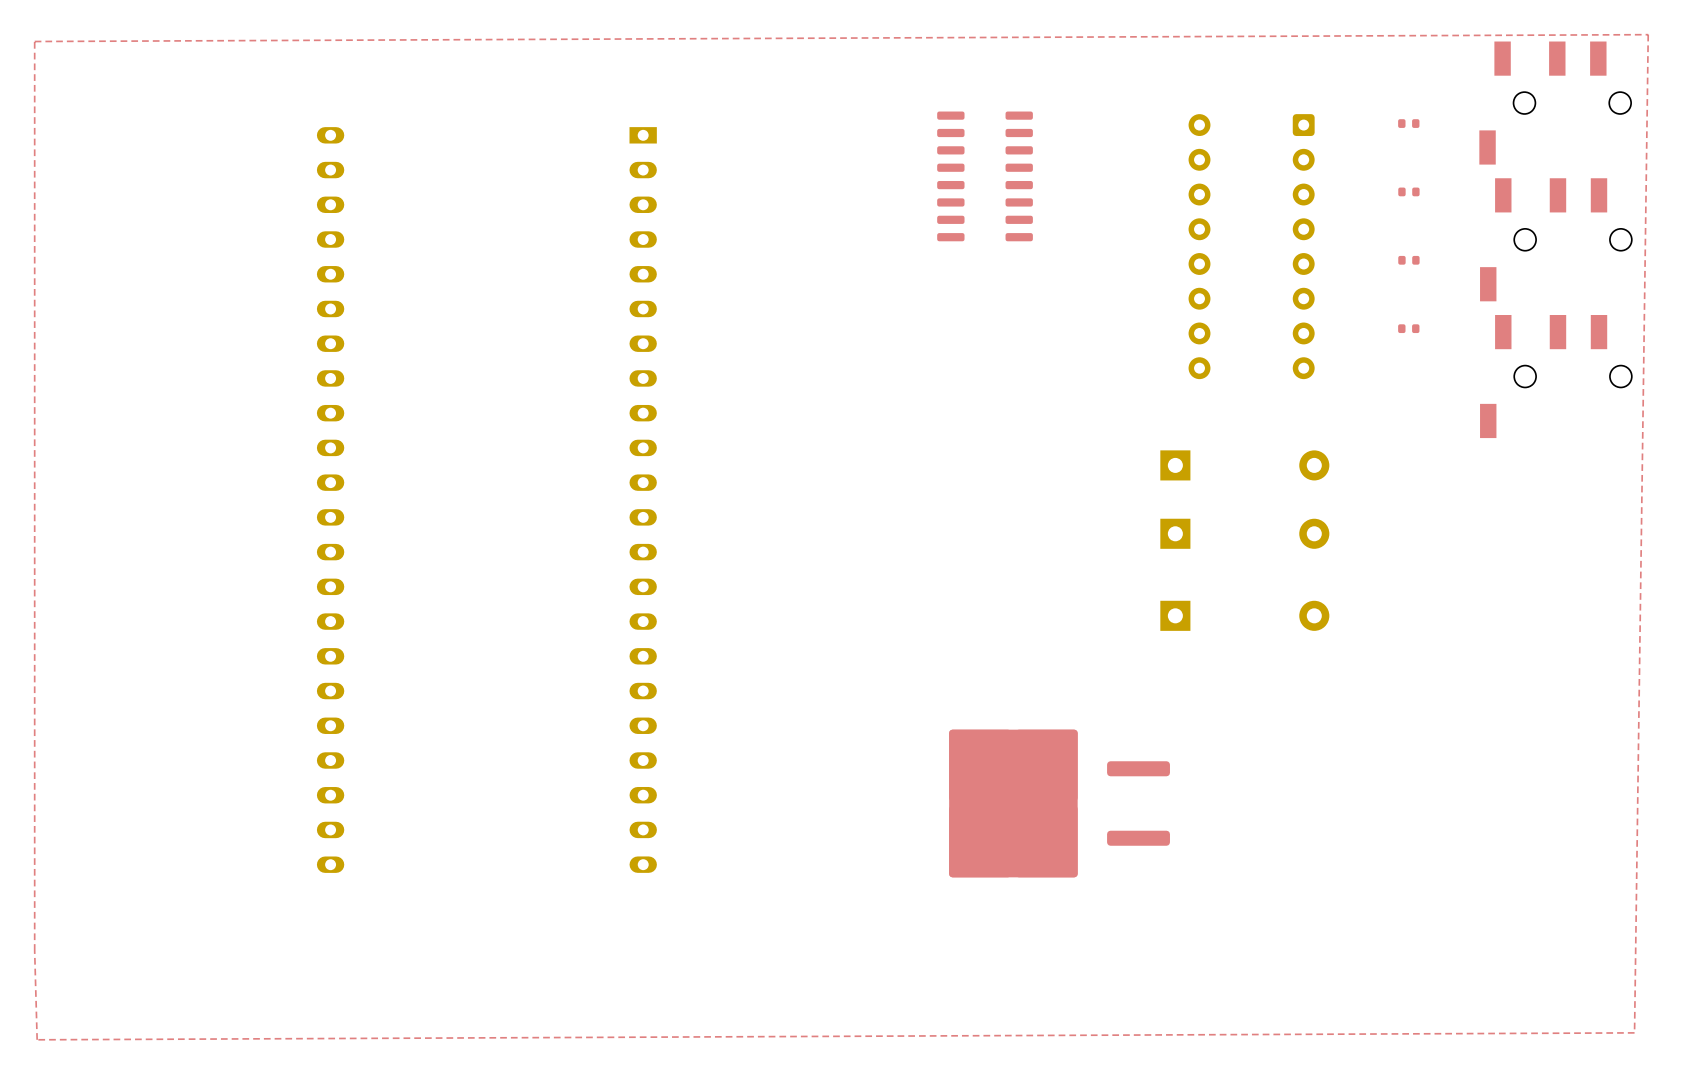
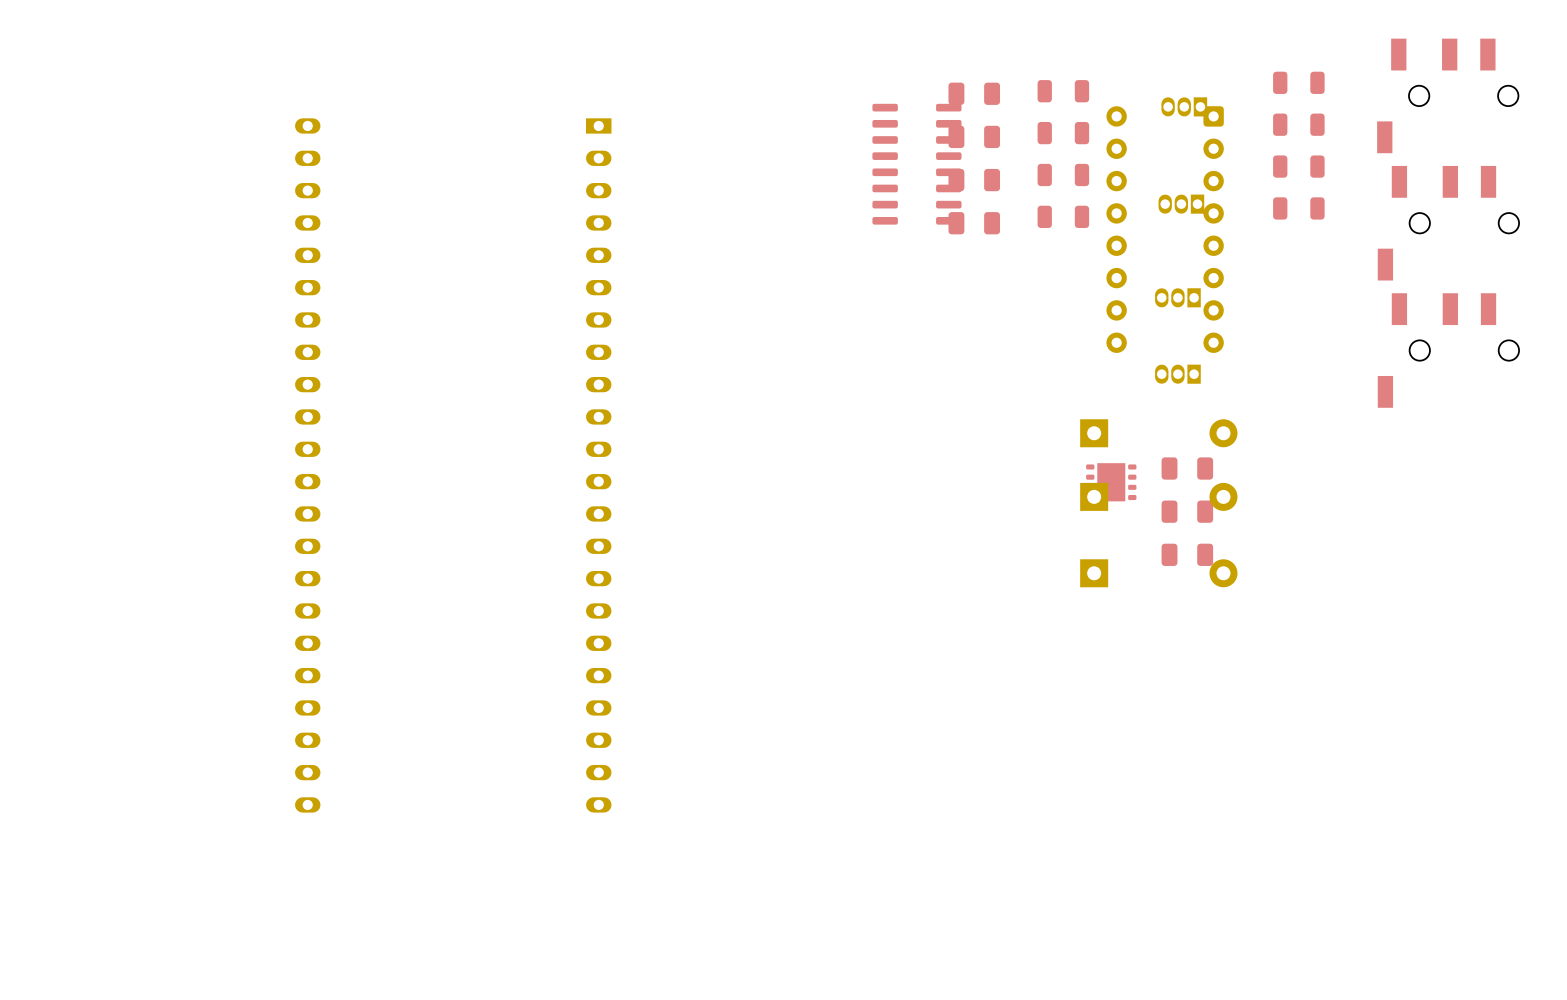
top zone outline: (1648, 34) (34, 41) (34, 950) (37, 1039) (1634, 1032) (1648, 34) -> none
part: none -> (1298, 82)
part: none -> (1063, 91)
part: none -> (974, 93)
part: none -> (1184, 106)
part: (1408, 123) -> none
part: none -> (1298, 124)
part: none -> (1063, 133)
part: none -> (974, 136)
part: none -> (1298, 166)
part: none -> (1063, 174)
part: (1408, 191) -> none
part: none -> (974, 180)
part: none -> (1181, 204)
part: none -> (1298, 208)
part: none -> (1063, 216)
part: none -> (974, 223)
part: (1408, 260) -> none
part: none -> (1177, 297)
part: (1408, 328) -> none
part: none -> (1177, 374)
part: none -> (1187, 468)
part: none -> (1111, 482)
part: none -> (1187, 511)
part: none -> (1187, 554)
part: (1059, 803) -> none

